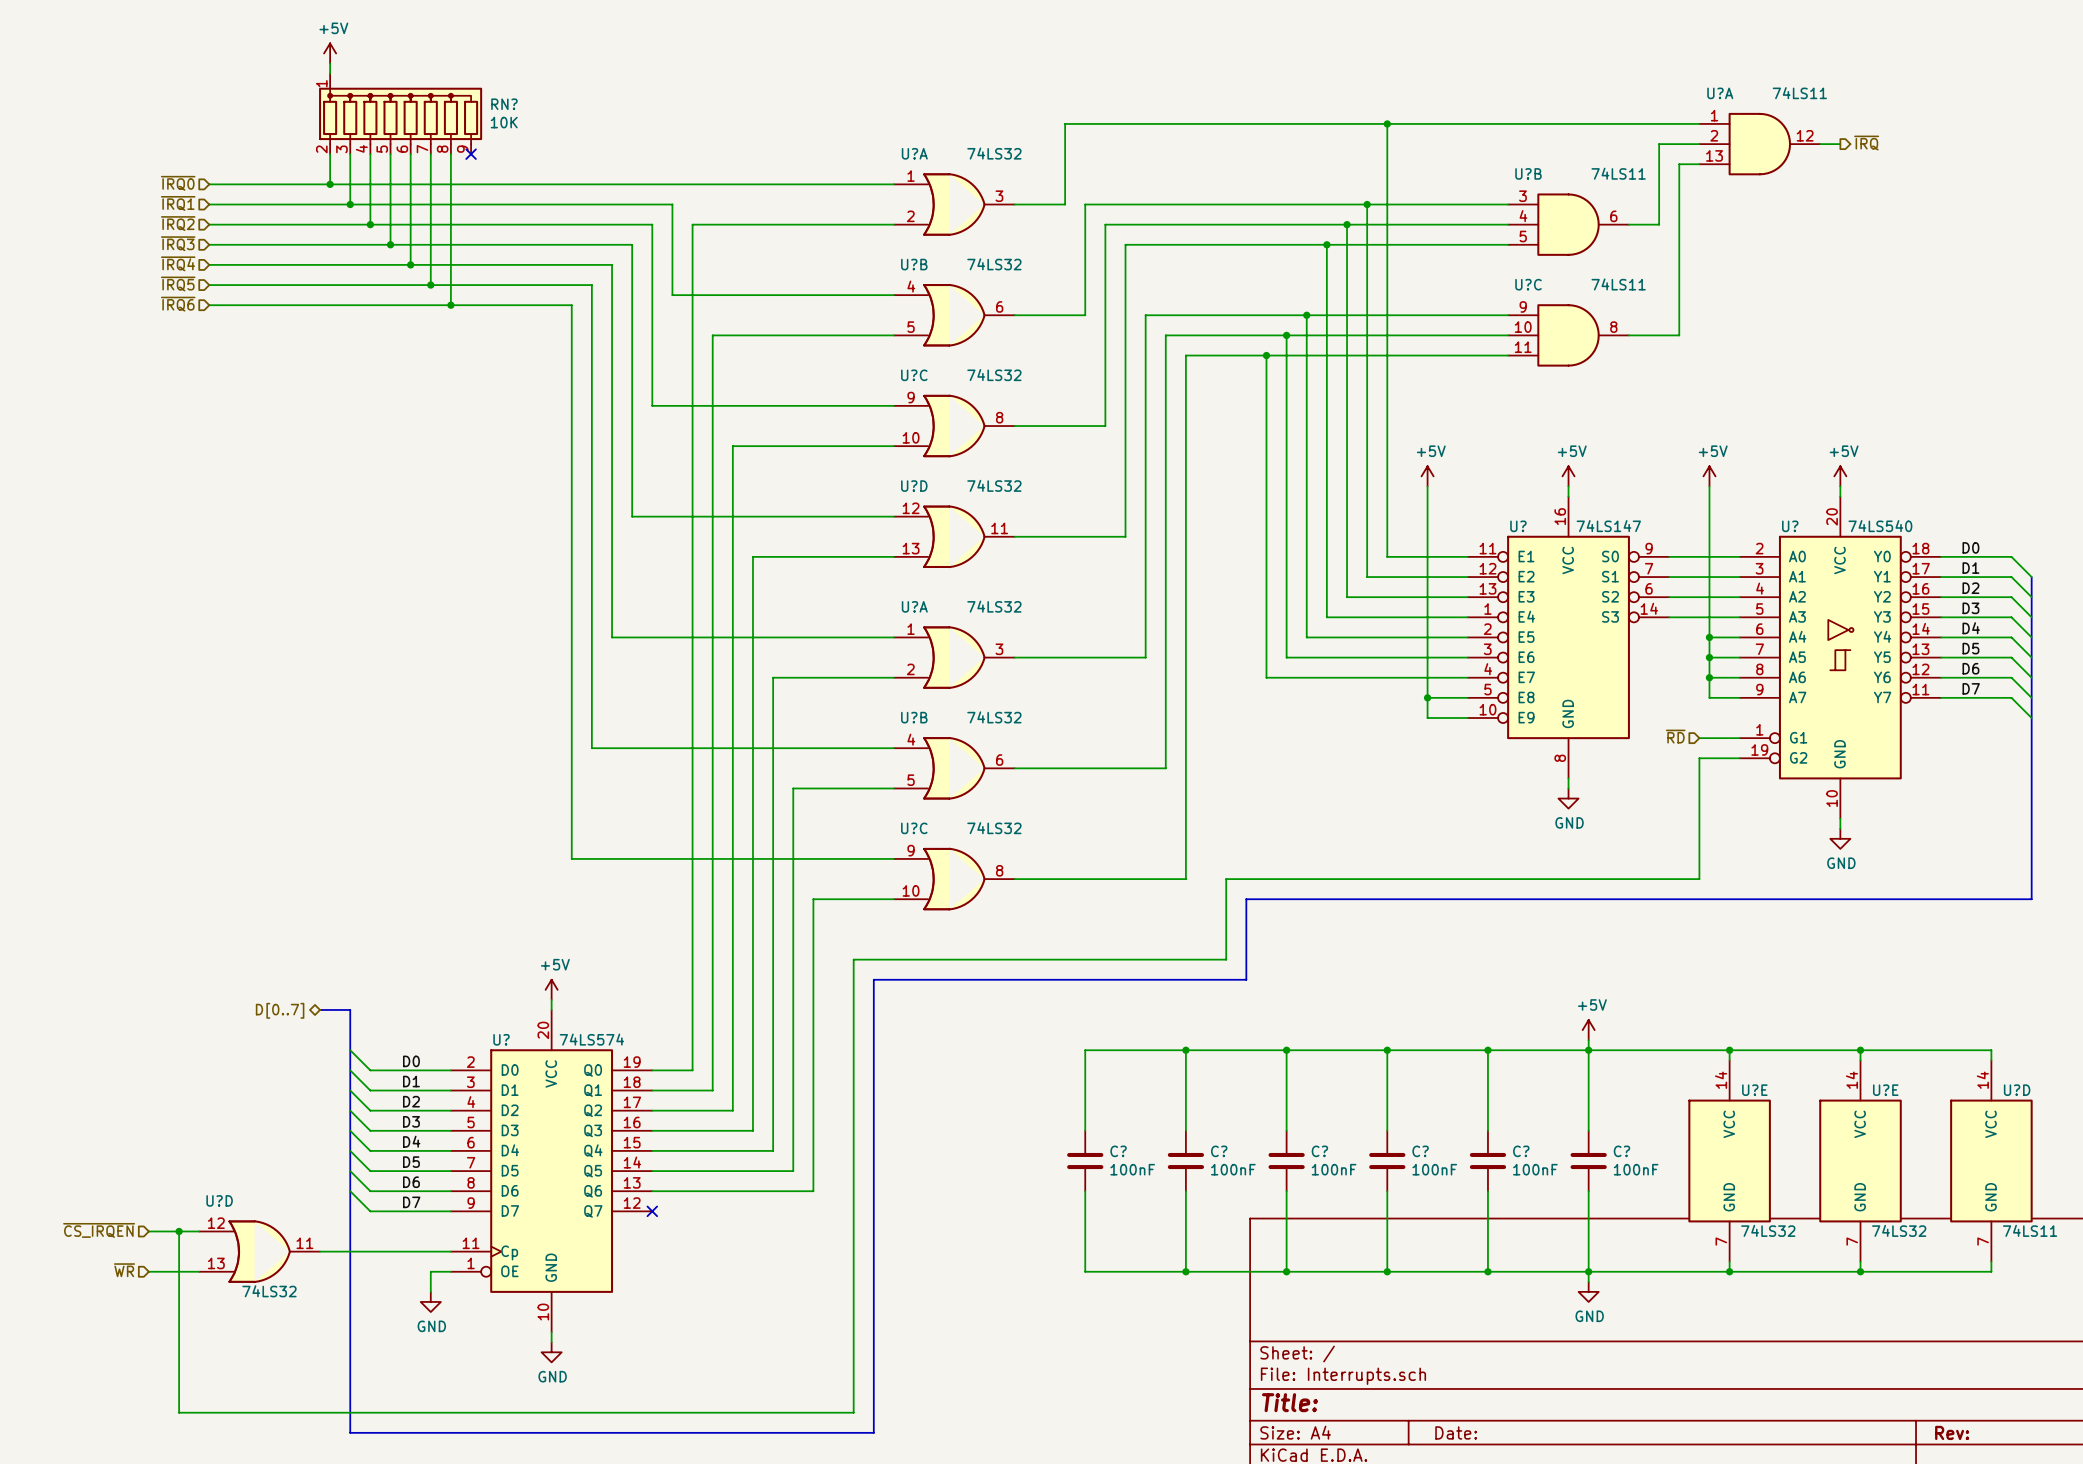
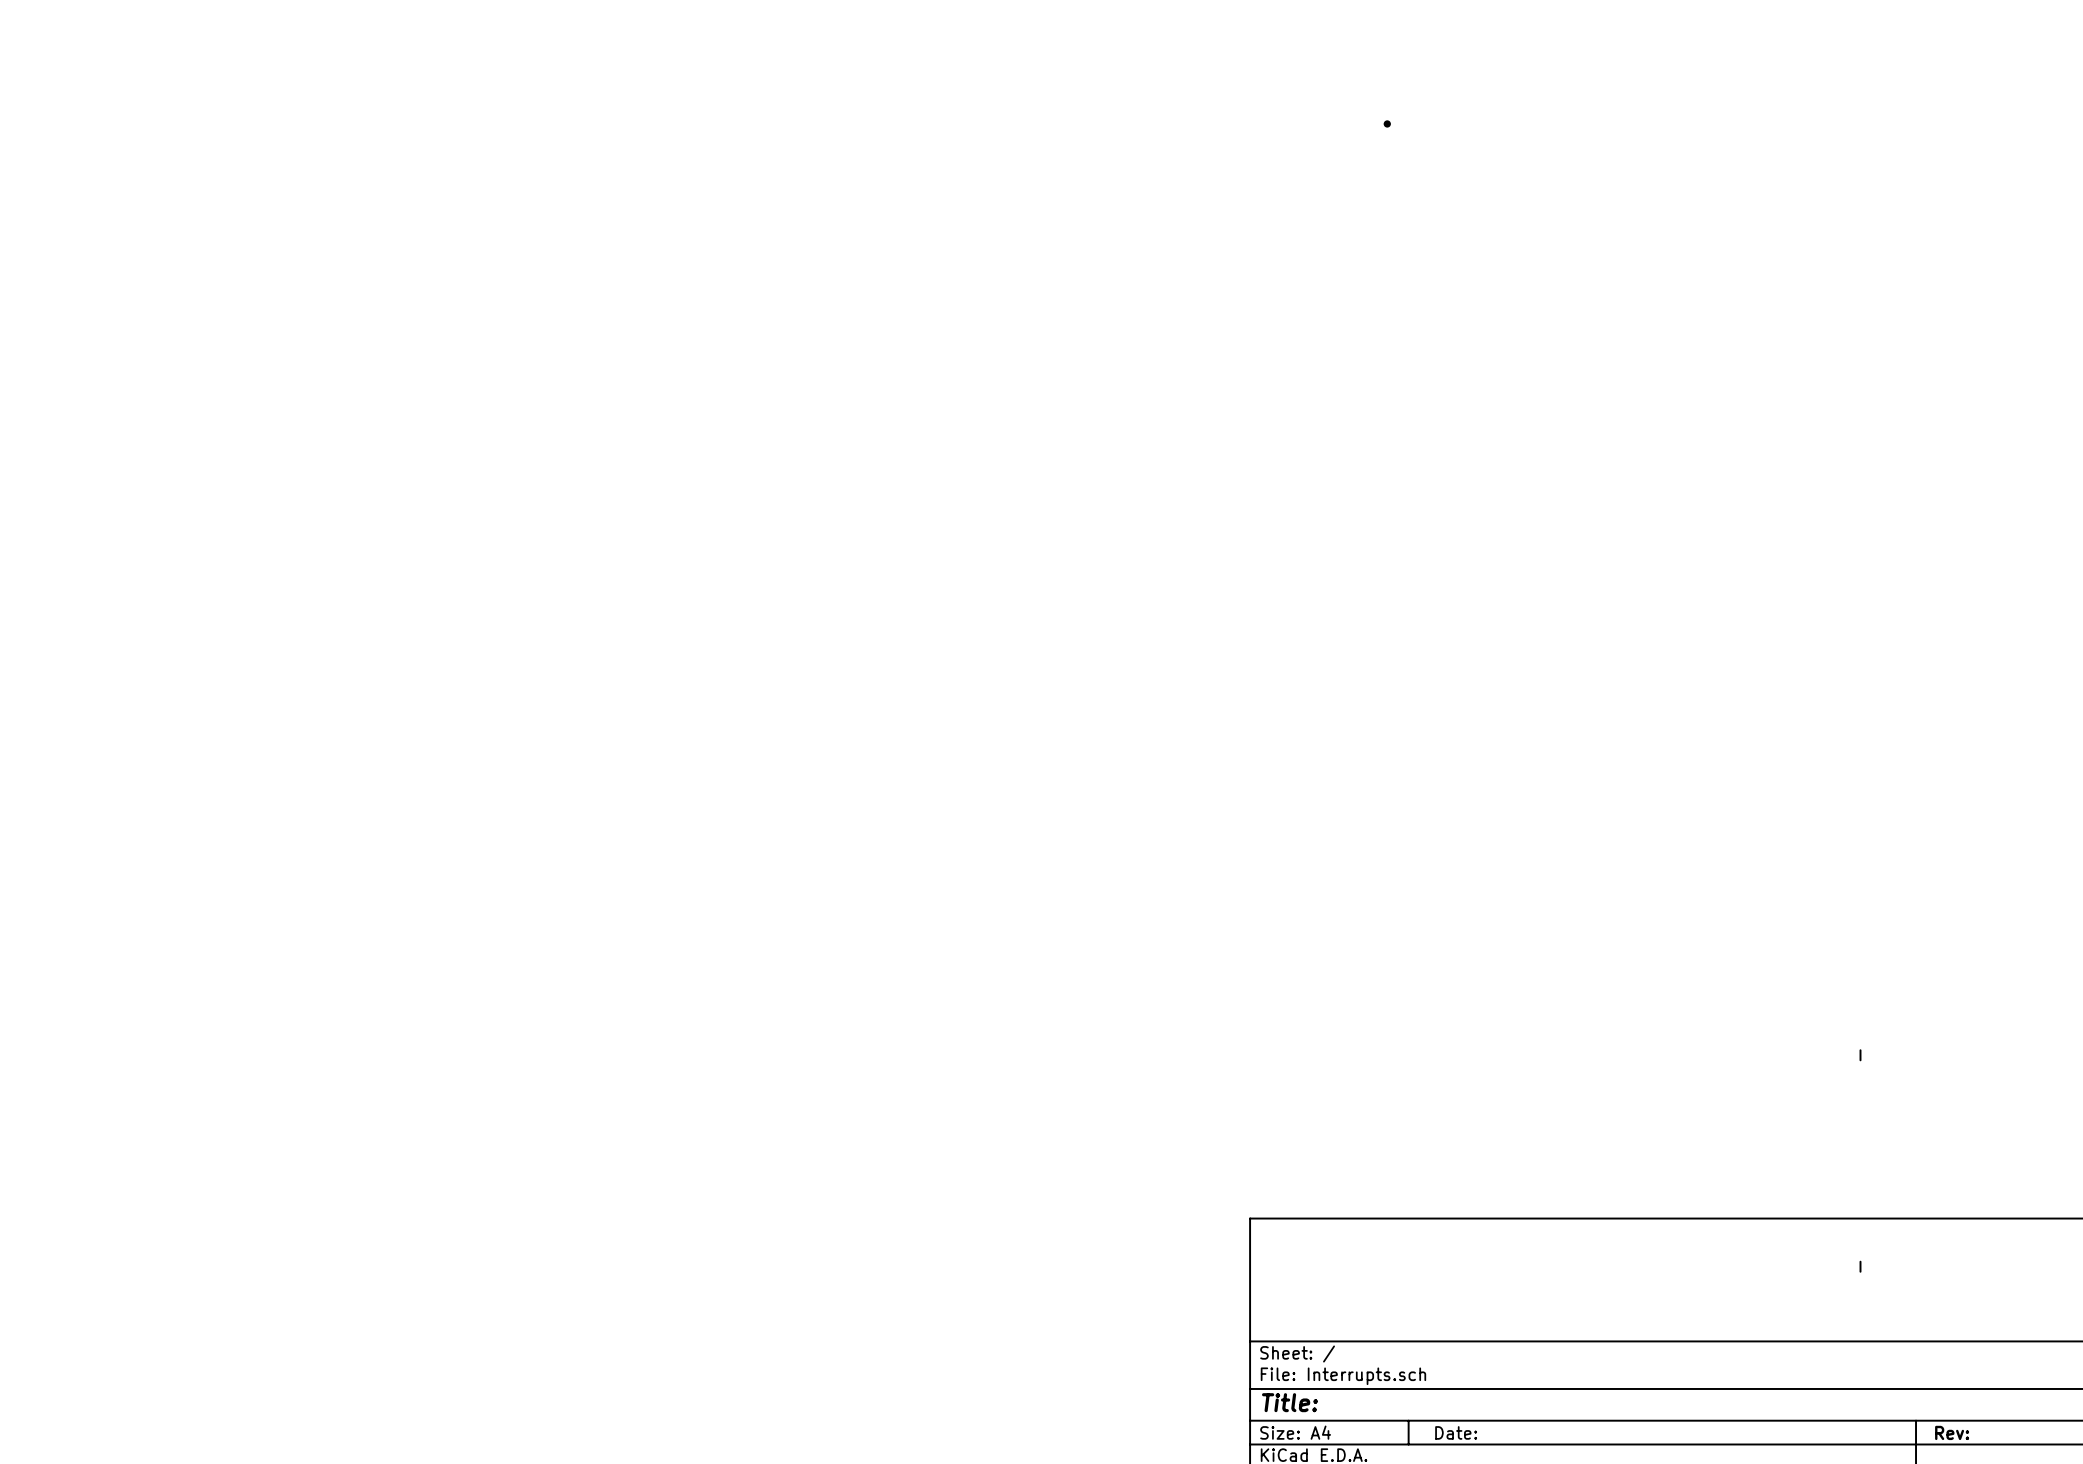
power symbol: +5V (330, 53) -> none
wire: (330, 63) (330, 73) -> none
RN?: 10K (400, 113) -> none
wire: (1387, 123) (1387, 556) (1467, 556) -> none
wire: (1699, 123) (1065, 123) (1065, 204) (1014, 204) -> none
hierarchical label: ~{IRQ} (1866, 143) -> none
wire: (1699, 144) (1659, 144) (1659, 224) (1628, 224) -> none
U?A: 74LS11 (1759, 144) -> none
wire: (1820, 144) (1840, 144) -> none
wire: (330, 154) (330, 184) -> none
wire: (350, 154) (350, 204) -> none
wire: (370, 154) (370, 224) -> none
wire: (390, 154) (390, 244) -> none
wire: (410, 154) (410, 264) -> none
wire: (430, 154) (430, 285) -> none
wire: (450, 154) (450, 305) -> none
no-connect mark: (471, 154) -> none
wire: (1699, 164) (1679, 164) (1679, 335) (1628, 335) -> none
hierarchical label: ~{IRQ0} (178, 183) -> none
wire: (209, 184) (893, 184) -> none
junction: (330, 184) -> none
hierarchical label: ~{IRQ1} (178, 203) -> none
wire: (209, 204) (672, 204) (672, 295) (893, 295) -> none
junction: (350, 204) -> none
U?A: 74LS32 (954, 204) -> none
wire: (1367, 204) (1367, 577) (1467, 577) -> none
junction: (1367, 204) -> none
wire: (1508, 204) (1085, 204) (1085, 315) (1014, 315) -> none
hierarchical label: ~{IRQ2} (178, 223) -> none
wire: (209, 224) (652, 224) (652, 405) (893, 405) -> none
junction: (370, 224) -> none
wire: (893, 224) (692, 224) (692, 1070) (652, 1070) -> none
wire: (1347, 224) (1347, 597) (1467, 597) -> none
junction: (1347, 224) -> none
wire: (1508, 224) (1105, 224) (1105, 426) (1014, 426) -> none
U?B: 74LS11 (1568, 224) -> none
hierarchical label: ~{IRQ3} (178, 243) -> none
wire: (209, 244) (632, 244) (632, 516) (893, 516) -> none
junction: (390, 244) -> none
wire: (1326, 244) (1326, 617) (1467, 617) -> none
junction: (1326, 244) -> none
wire: (1508, 244) (1125, 244) (1125, 536) (1014, 536) -> none
hierarchical label: ~{IRQ4} (178, 263) -> none
wire: (209, 264) (612, 264) (612, 637) (893, 637) -> none
junction: (410, 264) -> none
hierarchical label: ~{IRQ5} (178, 284) -> none
wire: (209, 285) (591, 285) (591, 748) (893, 748) -> none
junction: (430, 285) -> none
hierarchical label: ~{IRQ6} (178, 304) -> none
wire: (209, 305) (571, 305) (571, 858) (893, 858) -> none
junction: (450, 305) -> none
U?B: 74LS32 (954, 315) -> none
wire: (1306, 315) (1306, 637) (1467, 637) -> none
junction: (1306, 315) -> none
wire: (1508, 315) (1145, 315) (1145, 657) (1014, 657) -> none
wire: (893, 335) (712, 335) (712, 1090) (652, 1090) -> none
wire: (1286, 335) (1286, 657) (1467, 657) -> none
junction: (1286, 335) -> none
wire: (1508, 335) (1165, 335) (1165, 768) (1014, 768) -> none
U?C: 74LS11 (1568, 335) -> none
wire: (1266, 355) (1266, 677) (1467, 677) -> none
junction: (1266, 355) -> none
wire: (1508, 355) (1185, 355) (1185, 879) (1014, 879) -> none
U?C: 74LS32 (954, 426) -> none
wire: (893, 446) (732, 446) (732, 1110) (652, 1110) -> none
power symbol: +5V (1427, 476) -> none
power symbol: +5V (1568, 476) -> none
power symbol: +5V (1709, 476) -> none
power symbol: +5V (1840, 476) -> none
wire: (1427, 486) (1427, 718) (1467, 718) -> none
wire: (1568, 486) (1568, 496) -> none
wire: (1709, 486) (1709, 697) (1739, 697) -> none
wire: (1840, 486) (1840, 496) -> none
U?D: 74LS32 (954, 536) -> none
label: D0 (1970, 547) -> none
wire: (893, 556) (752, 556) (752, 1130) (652, 1130) -> none
wire: (1669, 556) (1739, 556) -> none
wire: (1941, 556) (2011, 556) (2031, 577) -> none
label: D1 (1970, 568) -> none
wire: (1669, 577) (1739, 577) -> none
wire: (1941, 577) (2011, 577) (2031, 597) -> none
bus: (2031, 577) (2031, 899) (1246, 899) (1246, 979) (873, 979) (873, 1432) (350, 1432) (350, 1009) (320, 1009) -> none
label: D2 (1970, 588) -> none
wire: (1669, 597) (1739, 597) -> none
wire: (1941, 597) (2011, 597) (2031, 617) -> none
label: D3 (1970, 608) -> none
wire: (1669, 617) (1739, 617) -> none
wire: (1941, 617) (2011, 617) (2031, 637) -> none
label: D4 (1971, 628) -> none
U?: 74LS147 (1568, 637) -> none
wire: (1709, 637) (1739, 637) -> none
junction: (1709, 637) -> none
wire: (1941, 637) (2011, 637) (2031, 657) -> none
label: D5 (1970, 648) -> none
U?A: 74LS32 (954, 657) -> none
wire: (1709, 657) (1739, 657) -> none
junction: (1709, 657) -> none
U?: 74LS540 (1840, 657) -> none
wire: (1941, 657) (2011, 657) (2031, 677) -> none
label: D6 (1970, 668) -> none
wire: (893, 677) (773, 677) (773, 1150) (652, 1150) -> none
wire: (1709, 677) (1739, 677) -> none
junction: (1709, 677) -> none
wire: (1941, 677) (2011, 677) (2031, 697) -> none
label: D7 (1971, 688) -> none
wire: (1427, 697) (1467, 697) -> none
junction: (1427, 697) -> none
wire: (1941, 697) (2011, 697) (2031, 718) -> none
hierarchical label: ~{RD} (1675, 736) -> none
wire: (1699, 738) (1739, 738) -> none
wire: (1739, 758) (1699, 758) (1699, 879) (1226, 879) (1226, 959) (853, 959) (853, 1412) (179, 1412) (179, 1231) -> none
U?B: 74LS32 (954, 768) -> none
wire: (1568, 778) (1568, 788) -> none
wire: (893, 788) (793, 788) (793, 1171) (652, 1171) -> none
power symbol: GND (1568, 798) -> none
wire: (1840, 818) (1840, 828) -> none
power symbol: GND (1840, 838) -> none
U?C: 74LS32 (954, 879) -> none
wire: (893, 899) (813, 899) (813, 1191) (652, 1191) -> none
power symbol: +5V (551, 989) -> none
wire: (551, 999) (551, 1009) -> none
hierarchical label: D[0..7] (280, 1010) -> none
power symbol: +5V (1588, 1030) -> none
wire: (1588, 1040) (1588, 1130) -> none
wire: (350, 1050) (370, 1070) (450, 1070) -> none
wire: (1185, 1050) (1185, 1130) -> none
junction: (1185, 1050) -> none
wire: (1286, 1050) (1286, 1130) -> none
junction: (1286, 1050) -> none
wire: (1387, 1050) (1387, 1130) -> none
junction: (1387, 1050) -> none
wire: (1487, 1050) (1487, 1130) -> none
junction: (1487, 1050) -> none
junction: (1588, 1050) -> none
wire: (1729, 1050) (1729, 1060) -> none
junction: (1729, 1050) -> none
junction: (1860, 1050) -> none
wire: (1991, 1060) (1991, 1050) (1085, 1050) (1085, 1130) -> none
label: D0 (411, 1061) -> none
wire: (350, 1070) (370, 1090) (450, 1090) -> none
label: D1 (411, 1081) -> none
wire: (350, 1090) (370, 1110) (450, 1110) -> none
label: D2 (411, 1101) -> none
wire: (350, 1110) (370, 1130) (450, 1130) -> none
label: D3 (411, 1121) -> none
wire: (350, 1130) (370, 1150) (450, 1150) -> none
label: D4 (411, 1141) -> none
wire: (350, 1150) (370, 1171) (450, 1171) -> none
C?: 100nF (1085, 1161) -> none
C?: 100nF (1185, 1161) -> none
C?: 100nF (1286, 1161) -> none
C?: 100nF (1387, 1161) -> none
C?: 100nF (1487, 1161) -> none
C?: 100nF (1588, 1161) -> none
U?E: 74LS32 (1729, 1161) -> none
U?E: 74LS32 (1860, 1161) -> none
U?D: 74LS11 (1991, 1161) -> none
label: D5 (411, 1162) -> none
wire: (350, 1171) (370, 1191) (450, 1191) -> none
U?: 74LS574 (551, 1171) -> none
label: D6 (411, 1182) -> none
wire: (350, 1191) (370, 1211) (450, 1211) -> none
wire: (1085, 1191) (1085, 1271) (1991, 1271) (1991, 1261) -> none
wire: (1185, 1191) (1185, 1271) -> none
wire: (1286, 1191) (1286, 1271) -> none
wire: (1387, 1191) (1387, 1271) -> none
wire: (1487, 1191) (1487, 1271) -> none
wire: (1588, 1191) (1588, 1281) -> none
label: D7 (411, 1202) -> none
no-connect mark: (652, 1211) -> none
hierarchical label: ~{CS_IRQEN} (99, 1230) -> none
wire: (148, 1231) (199, 1231) -> none
junction: (179, 1231) -> none
U?D: 74LS32 (259, 1251) -> none
wire: (320, 1251) (450, 1251) -> none
wire: (1729, 1261) (1729, 1271) -> none
hierarchical label: ~{WR} (124, 1270) -> none
wire: (148, 1271) (199, 1271) -> none
wire: (450, 1271) (430, 1271) (430, 1291) -> none
junction: (1185, 1271) -> none
junction: (1286, 1271) -> none
junction: (1387, 1271) -> none
junction: (1487, 1271) -> none
junction: (1588, 1271) -> none
junction: (1729, 1271) -> none
junction: (1860, 1271) -> none
power symbol: GND (1588, 1291) -> none
power symbol: GND (430, 1301) -> none
wire: (551, 1332) (551, 1342) -> none
power symbol: GND (551, 1352) -> none

